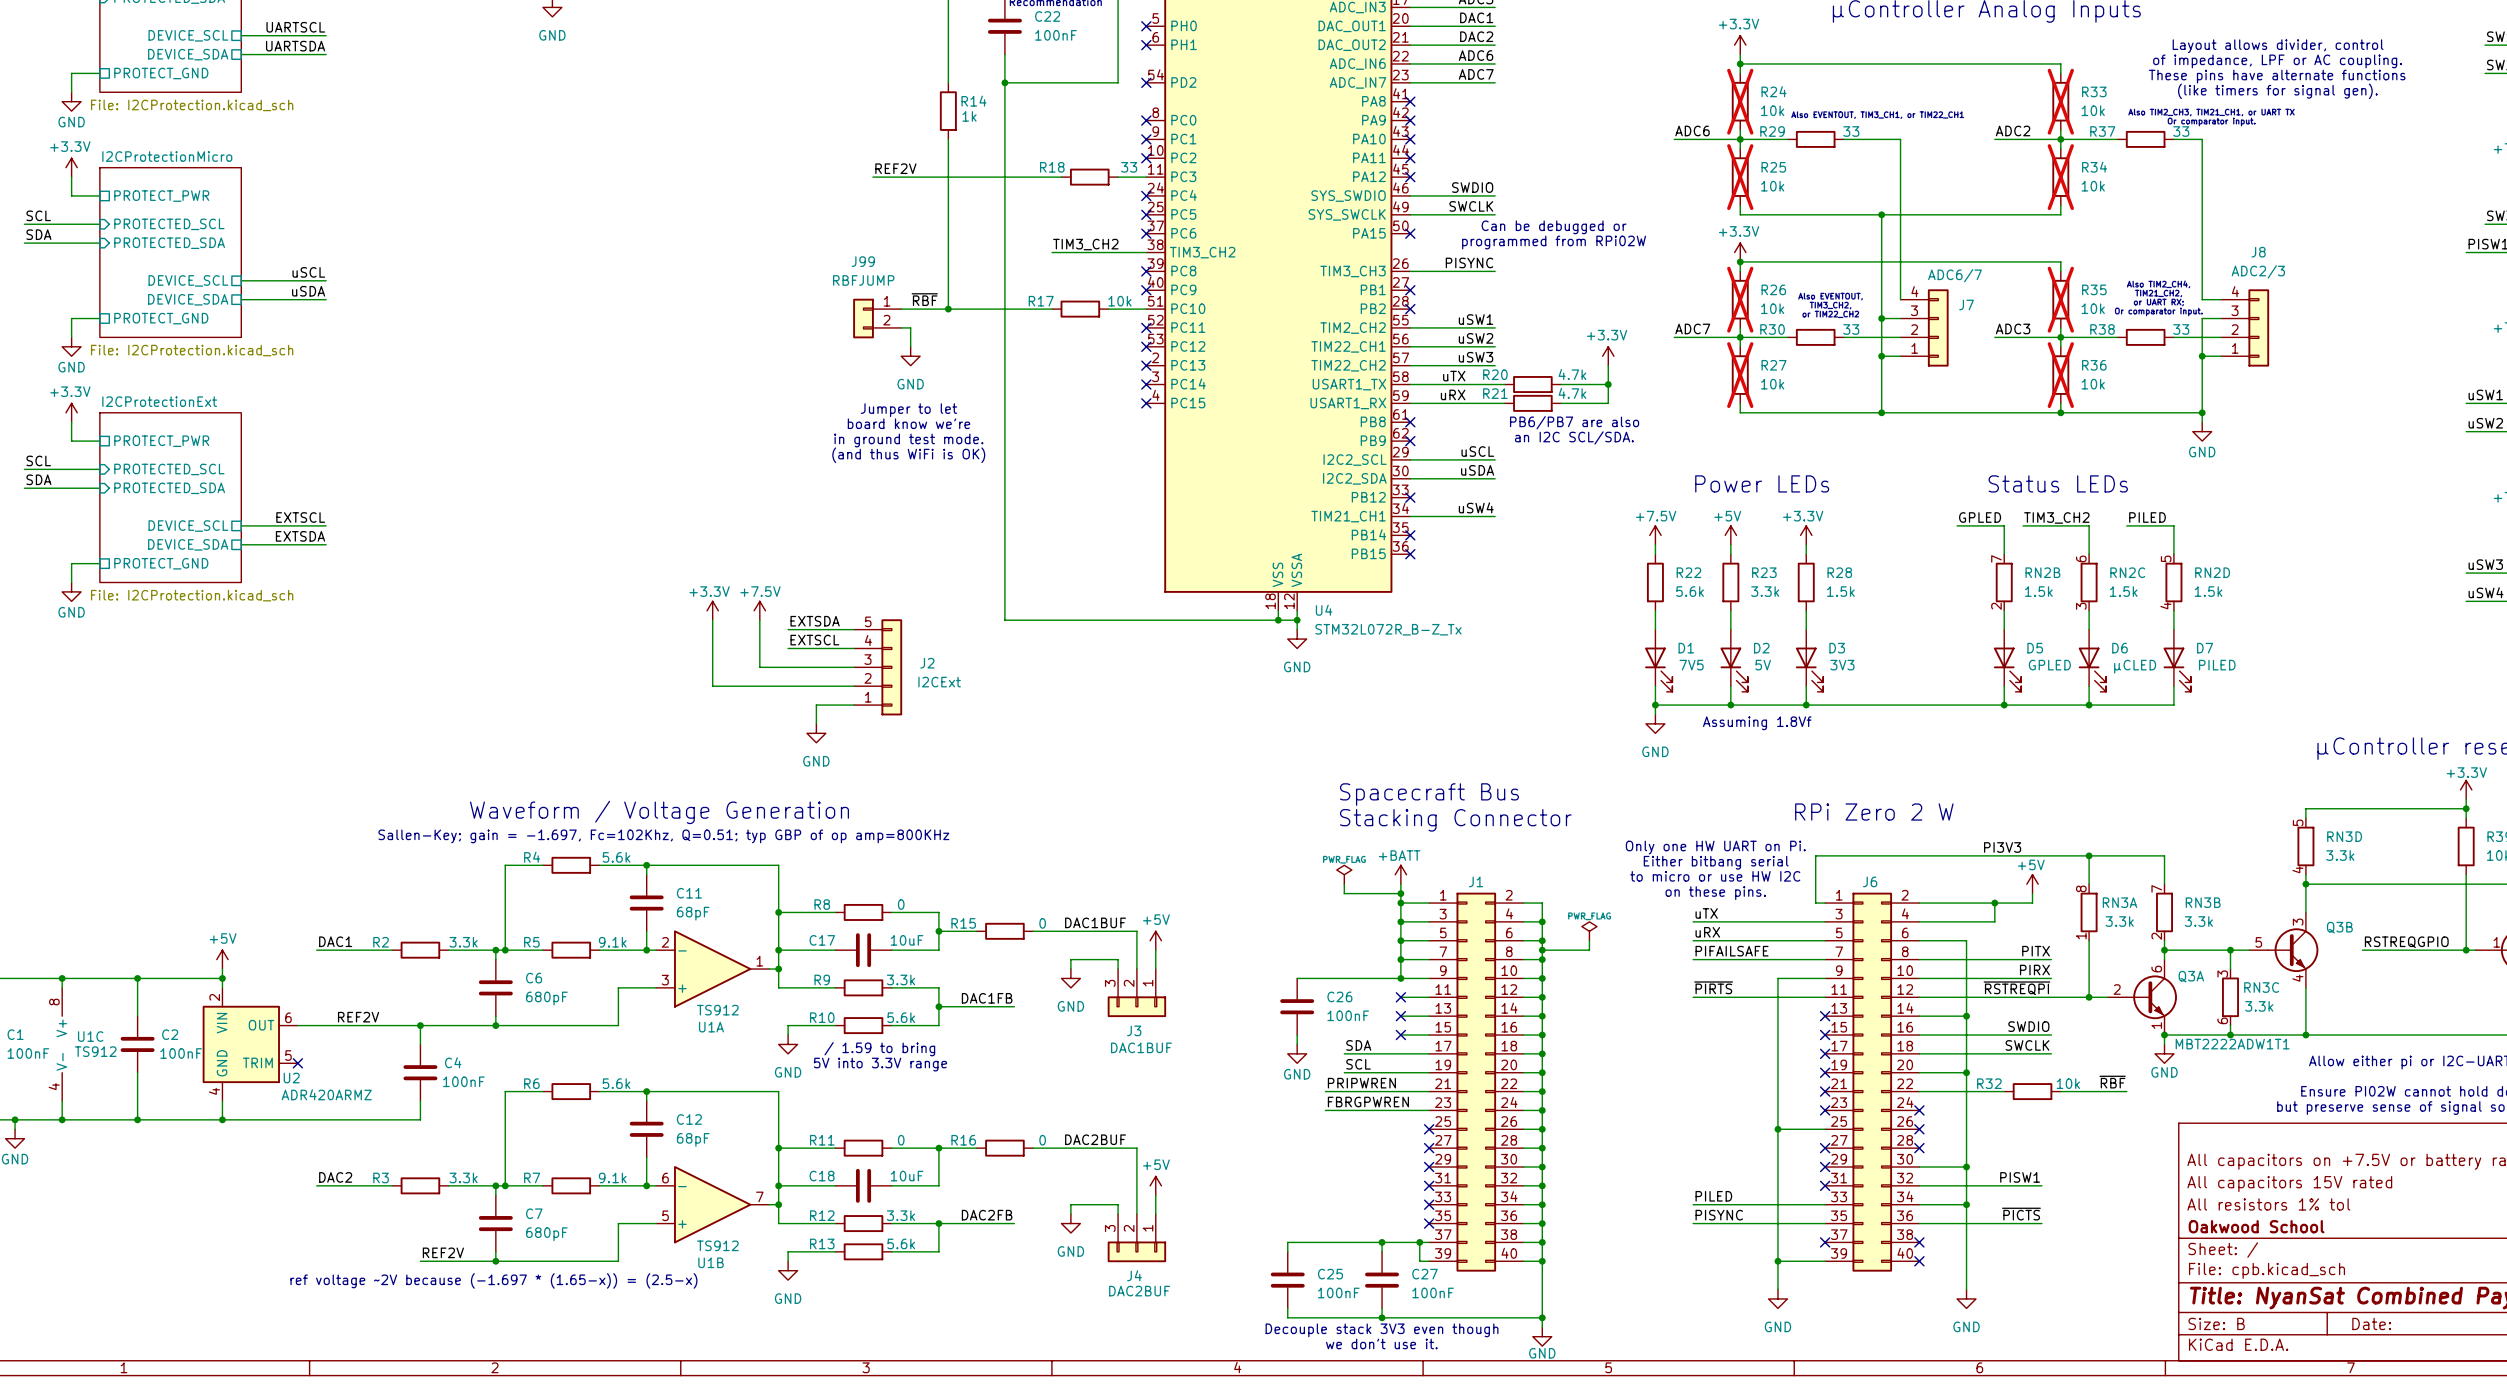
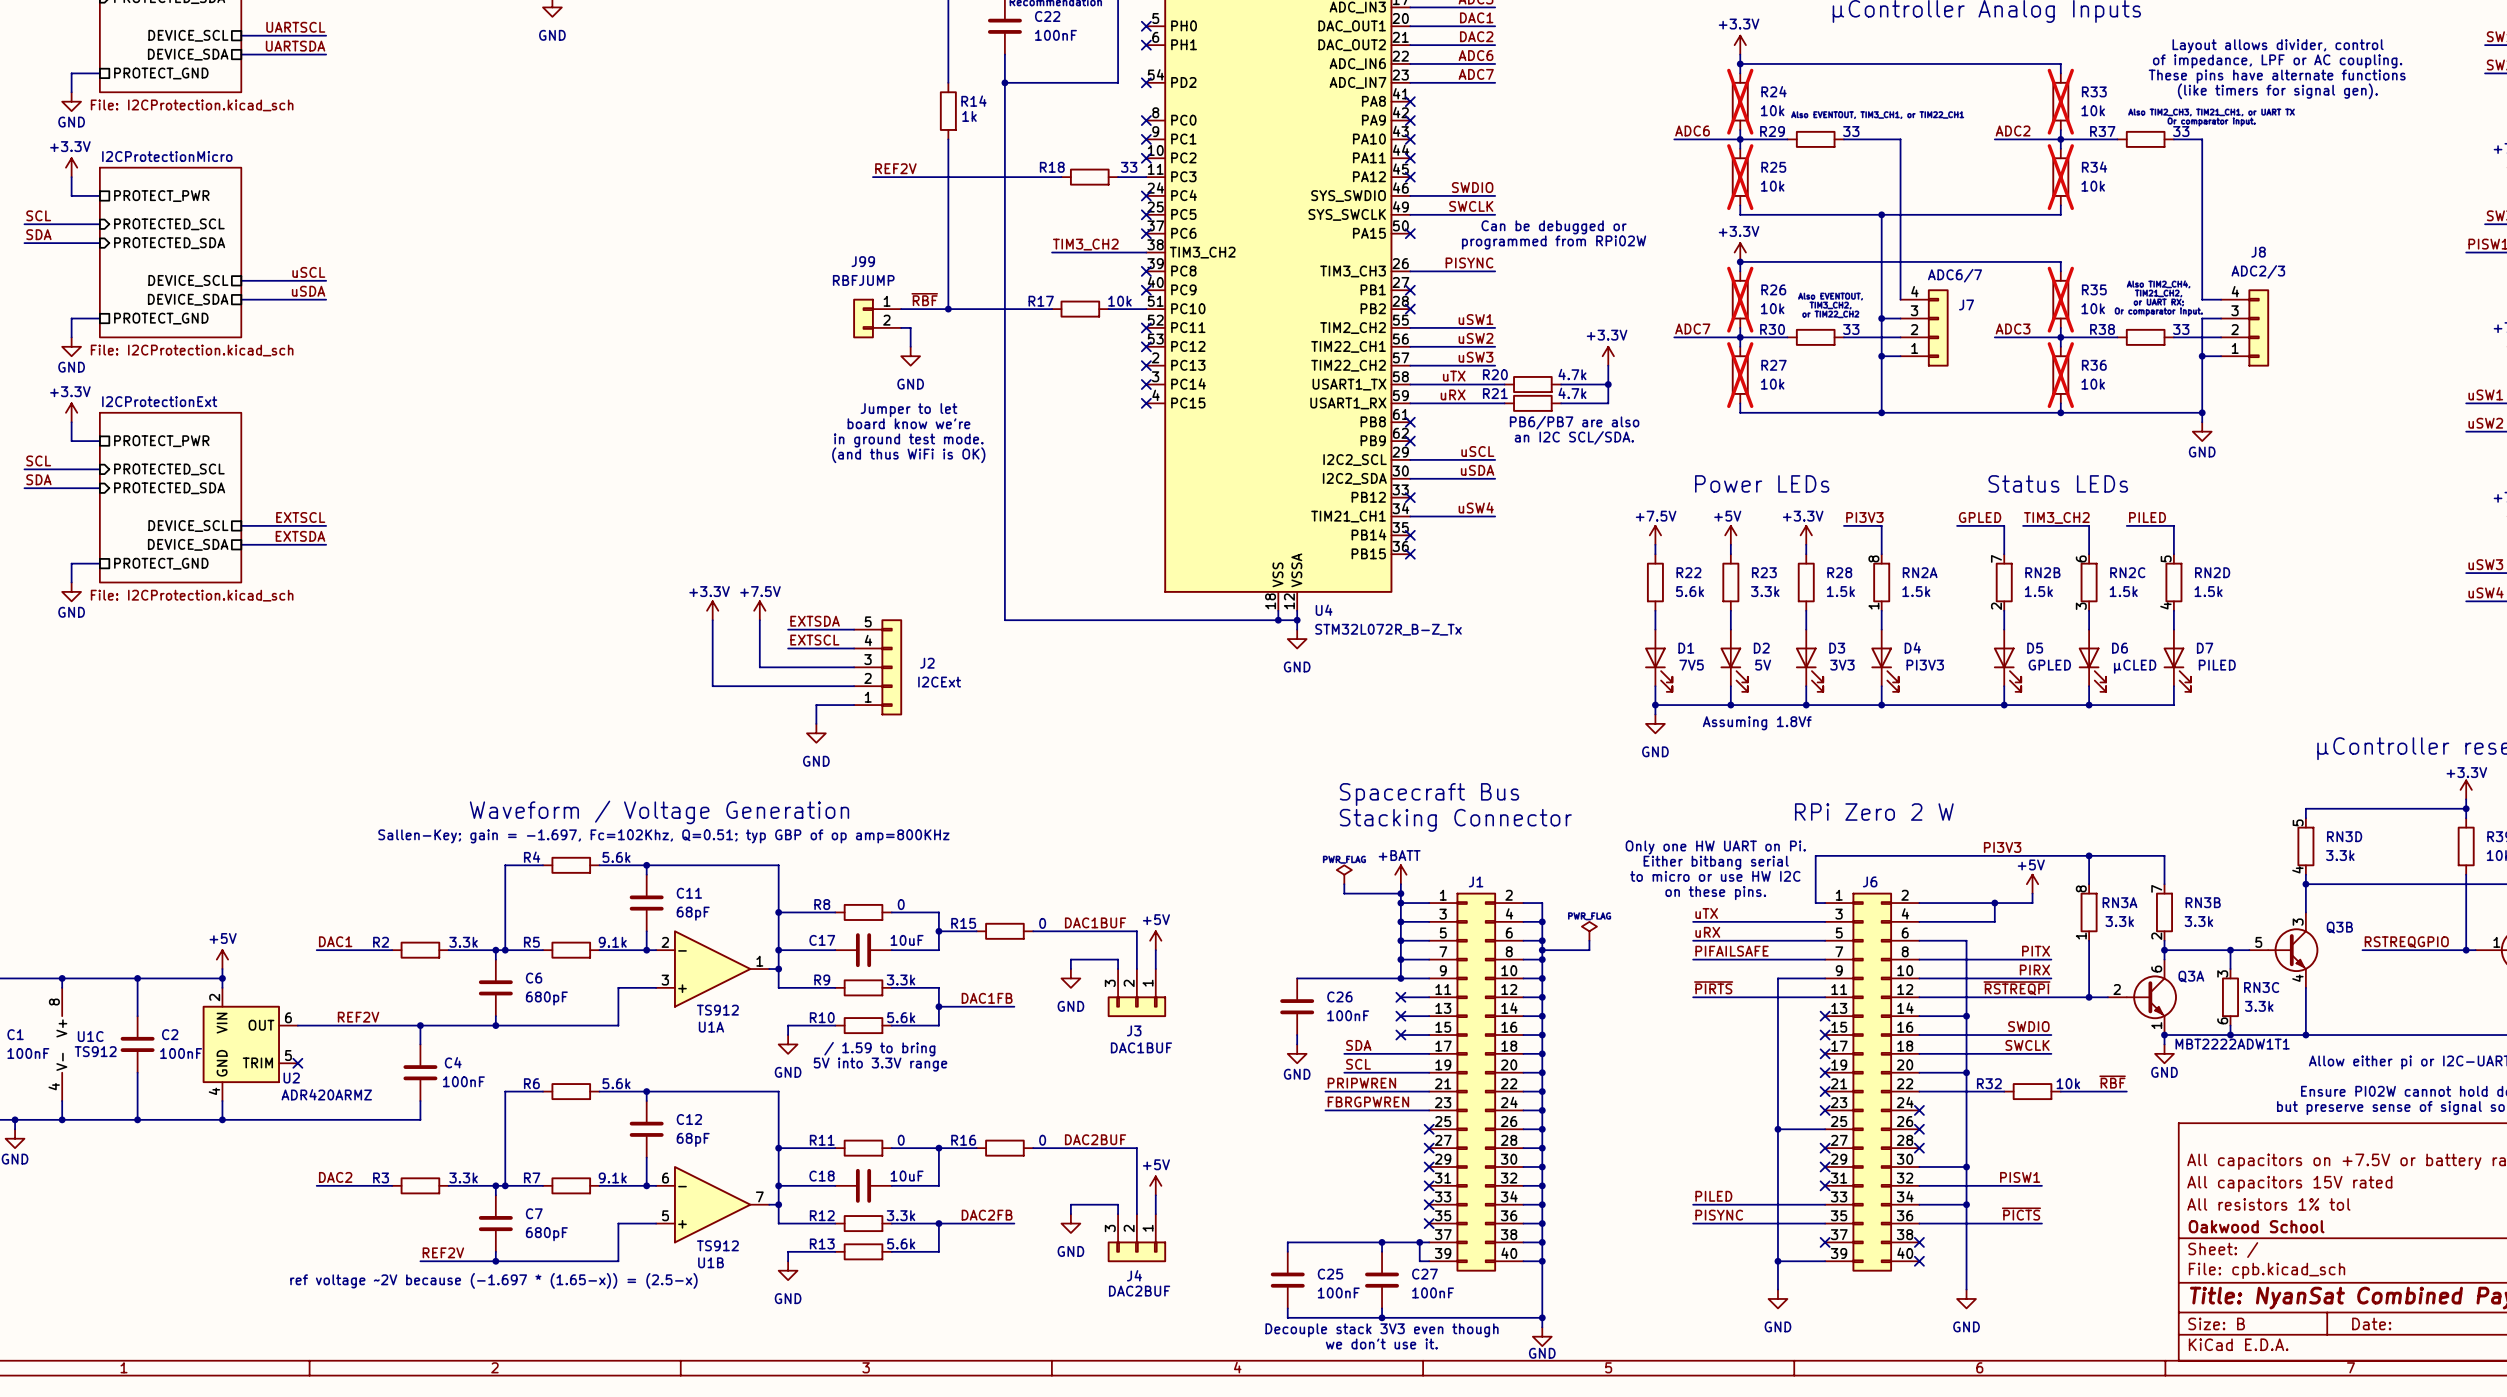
label: none -> PI3V3 (1864, 517)
wire: none -> (1843, 525) (1881, 525) (1881, 554)
RN2A: none -> 1.5k (1881, 582)
wire: none -> (1881, 610) (1881, 629)
D4: none -> PI3V3 (1884, 660)
wire: none -> (1881, 686) (1881, 705)
junction: none -> (1881, 705)

